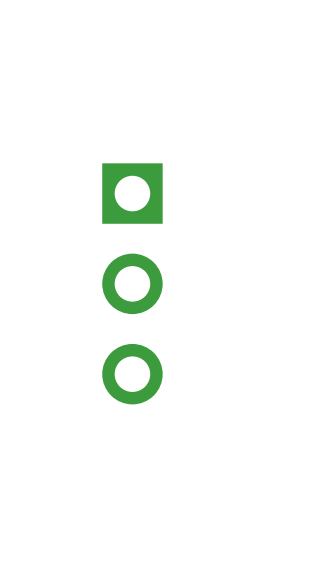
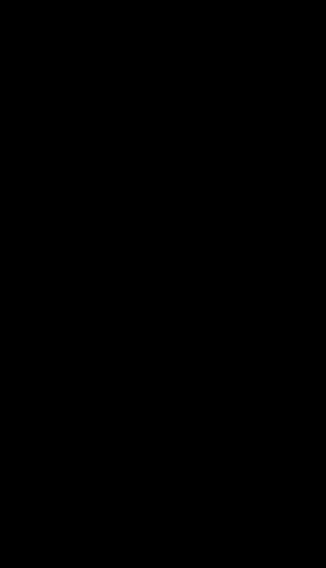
part: (132, 283) -> none

